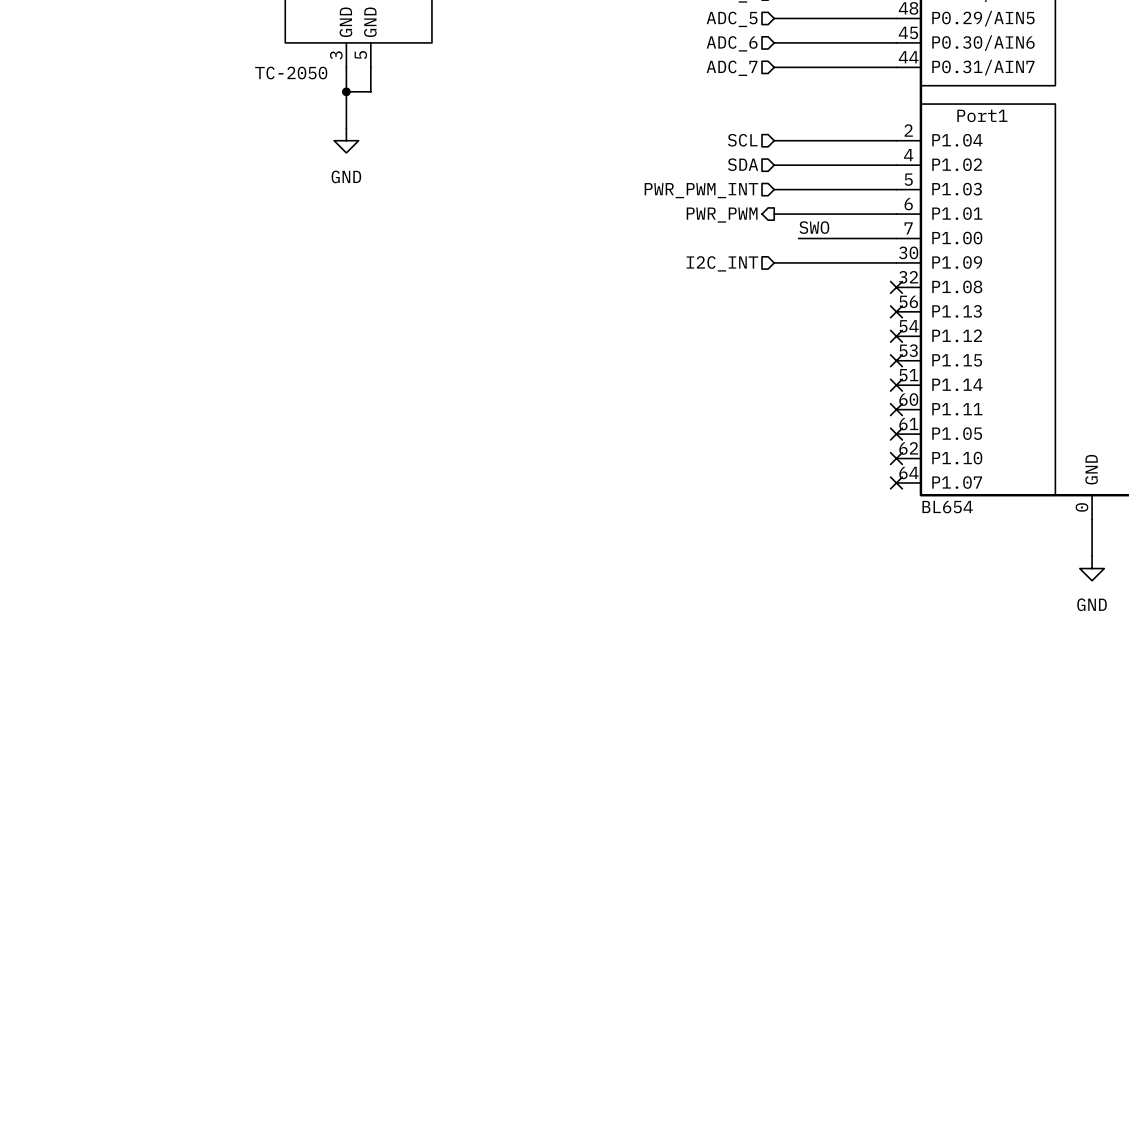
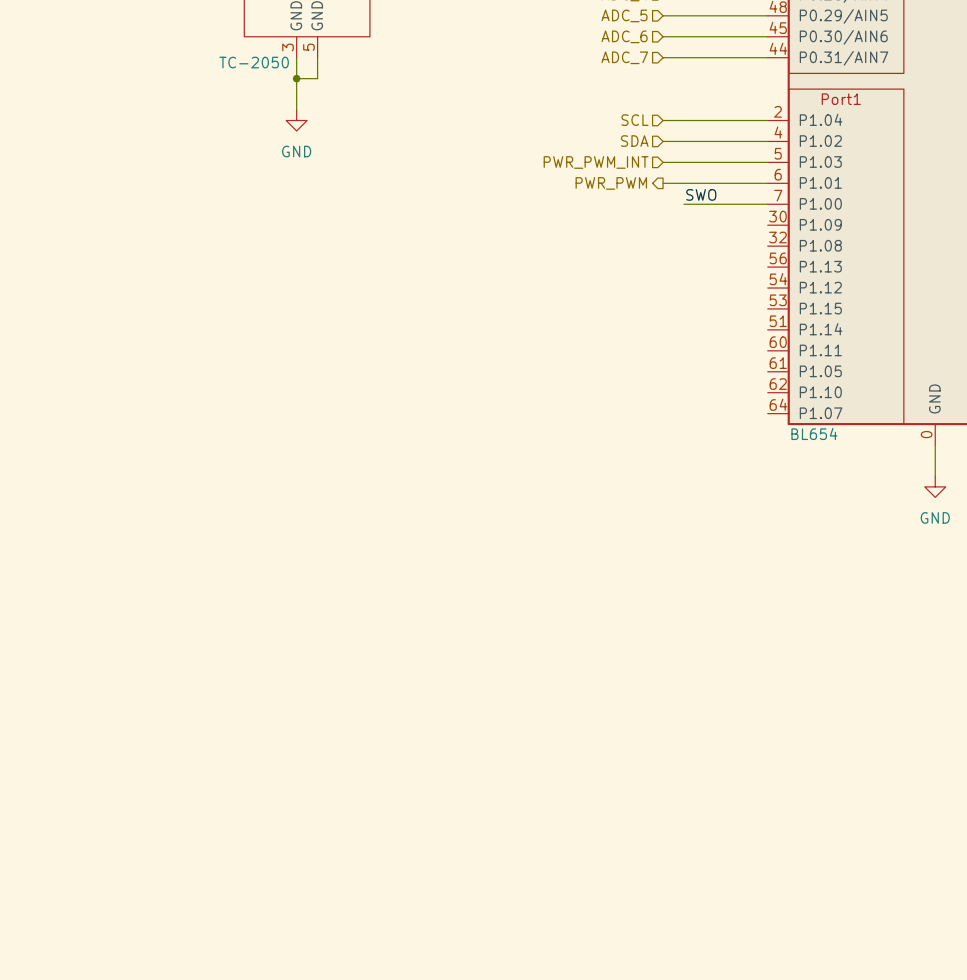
wire: (774, 262) (896, 262) -> none
hierarchical label: I2C_INT (722, 263) -> none
no-connect mark: (896, 287) -> none
no-connect mark: (896, 311) -> none
no-connect mark: (896, 336) -> none
no-connect mark: (896, 360) -> none
no-connect mark: (896, 385) -> none
no-connect mark: (896, 409) -> none
no-connect mark: (896, 434) -> none
no-connect mark: (896, 458) -> none
no-connect mark: (896, 482) -> none

